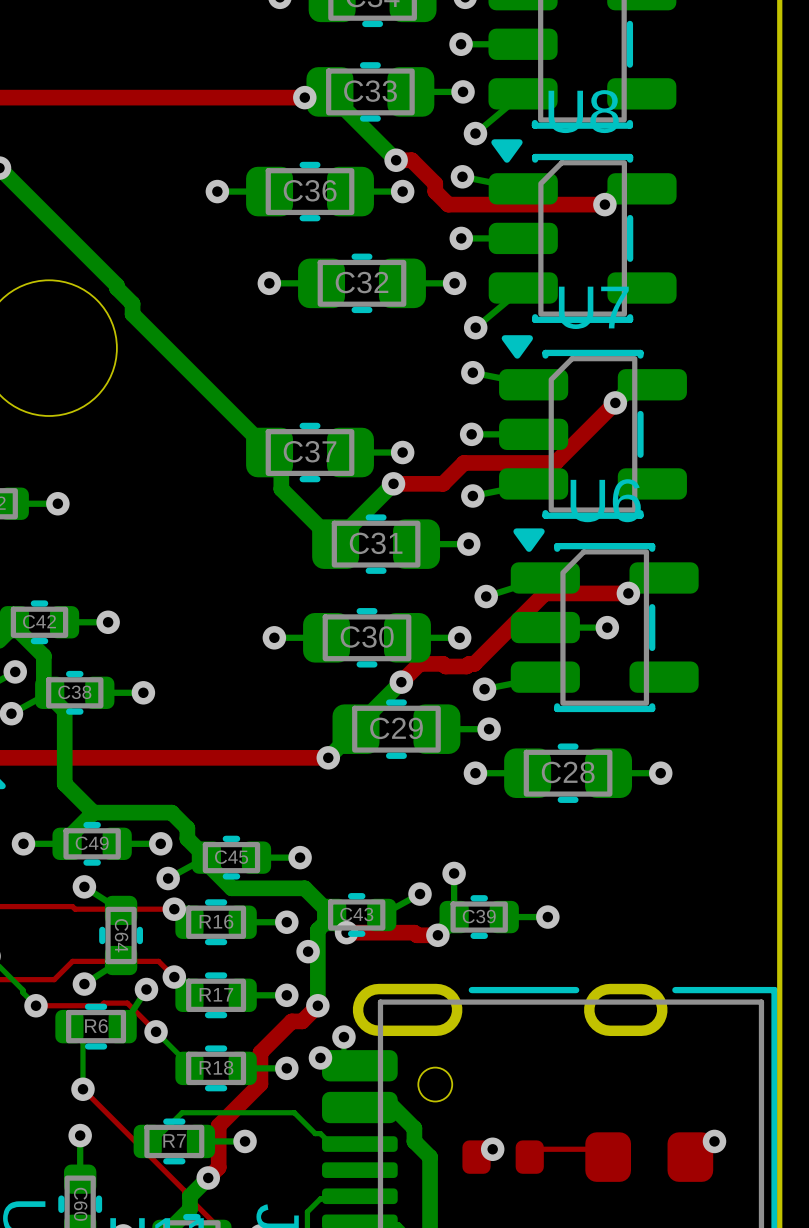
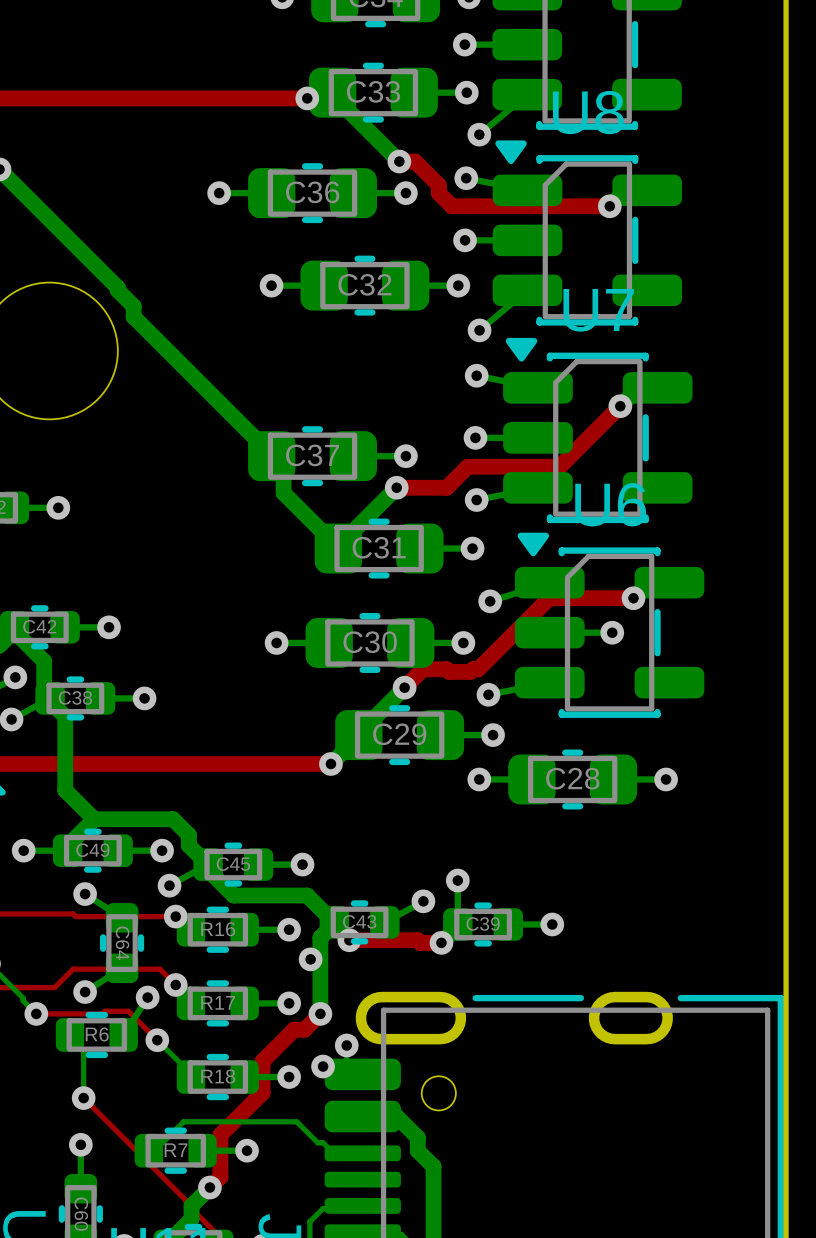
via: (714, 1141) -> none
via: (492, 1149) -> none
top track: (594, 1149) (534, 1149) -> none
part: (503, 1157) -> none
part: (649, 1157) -> none

